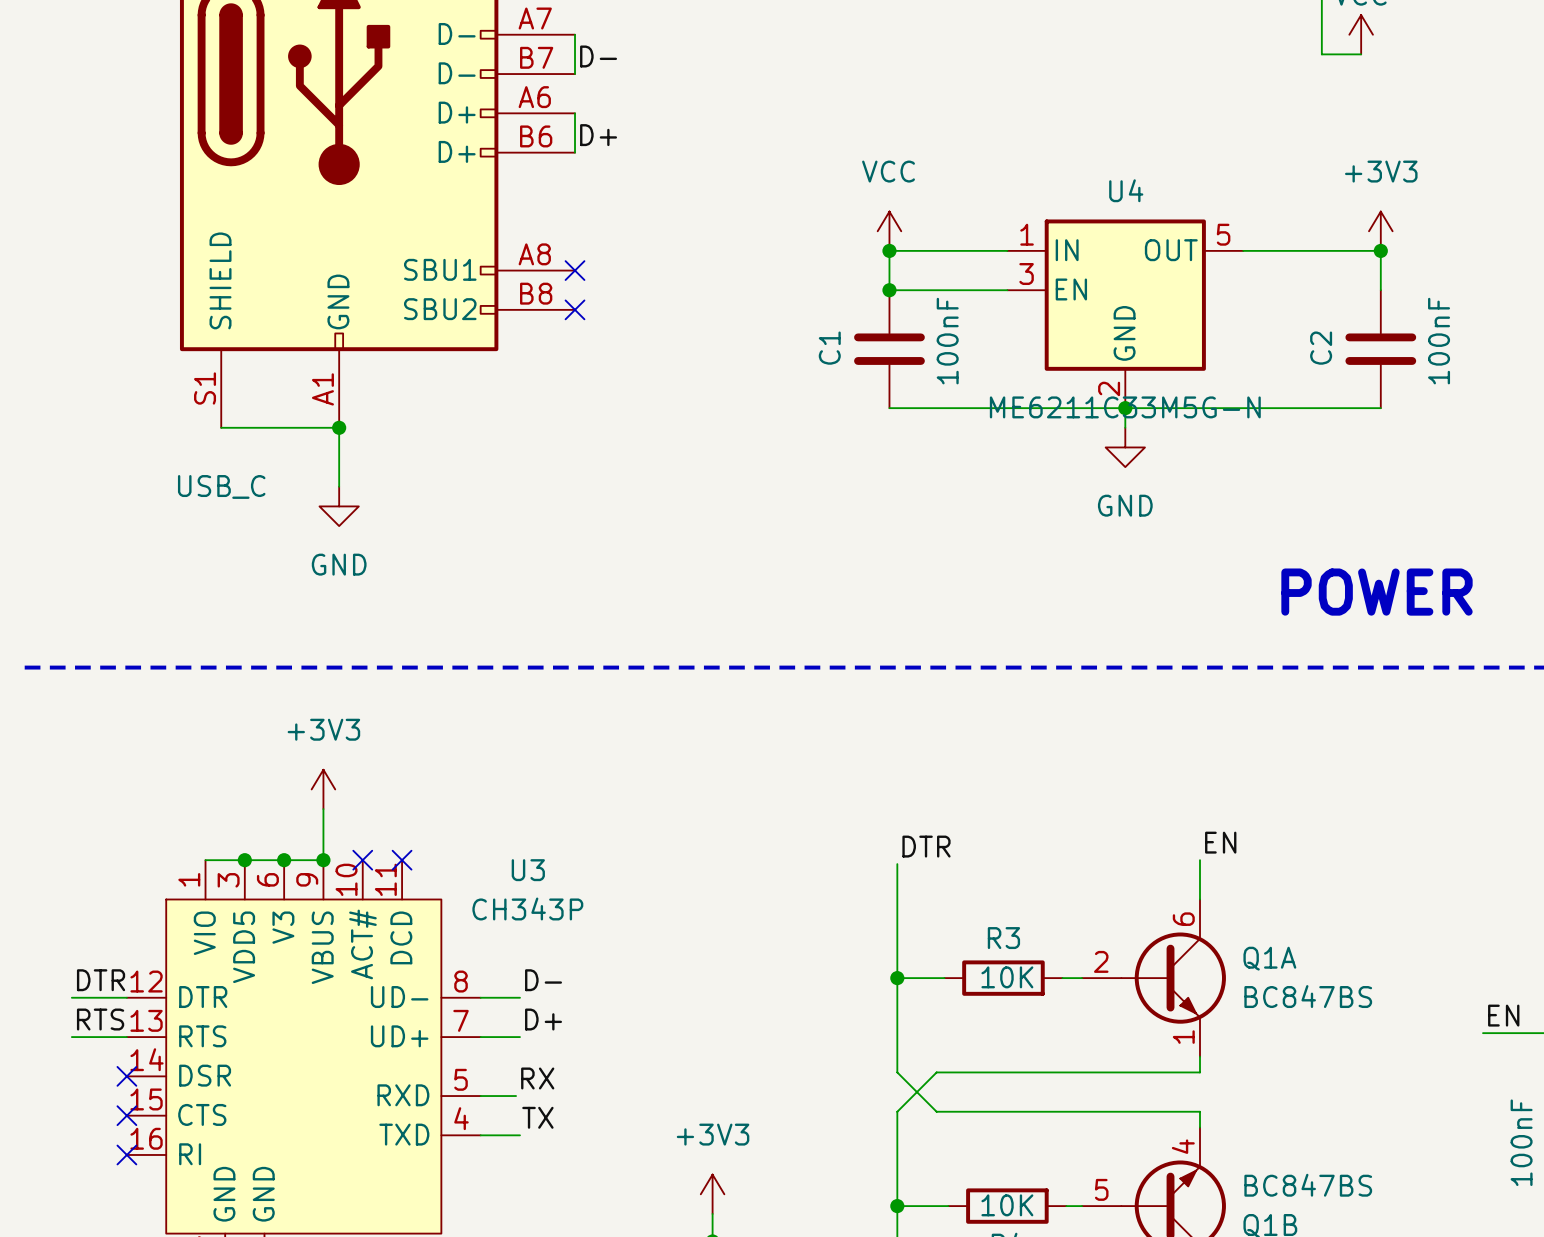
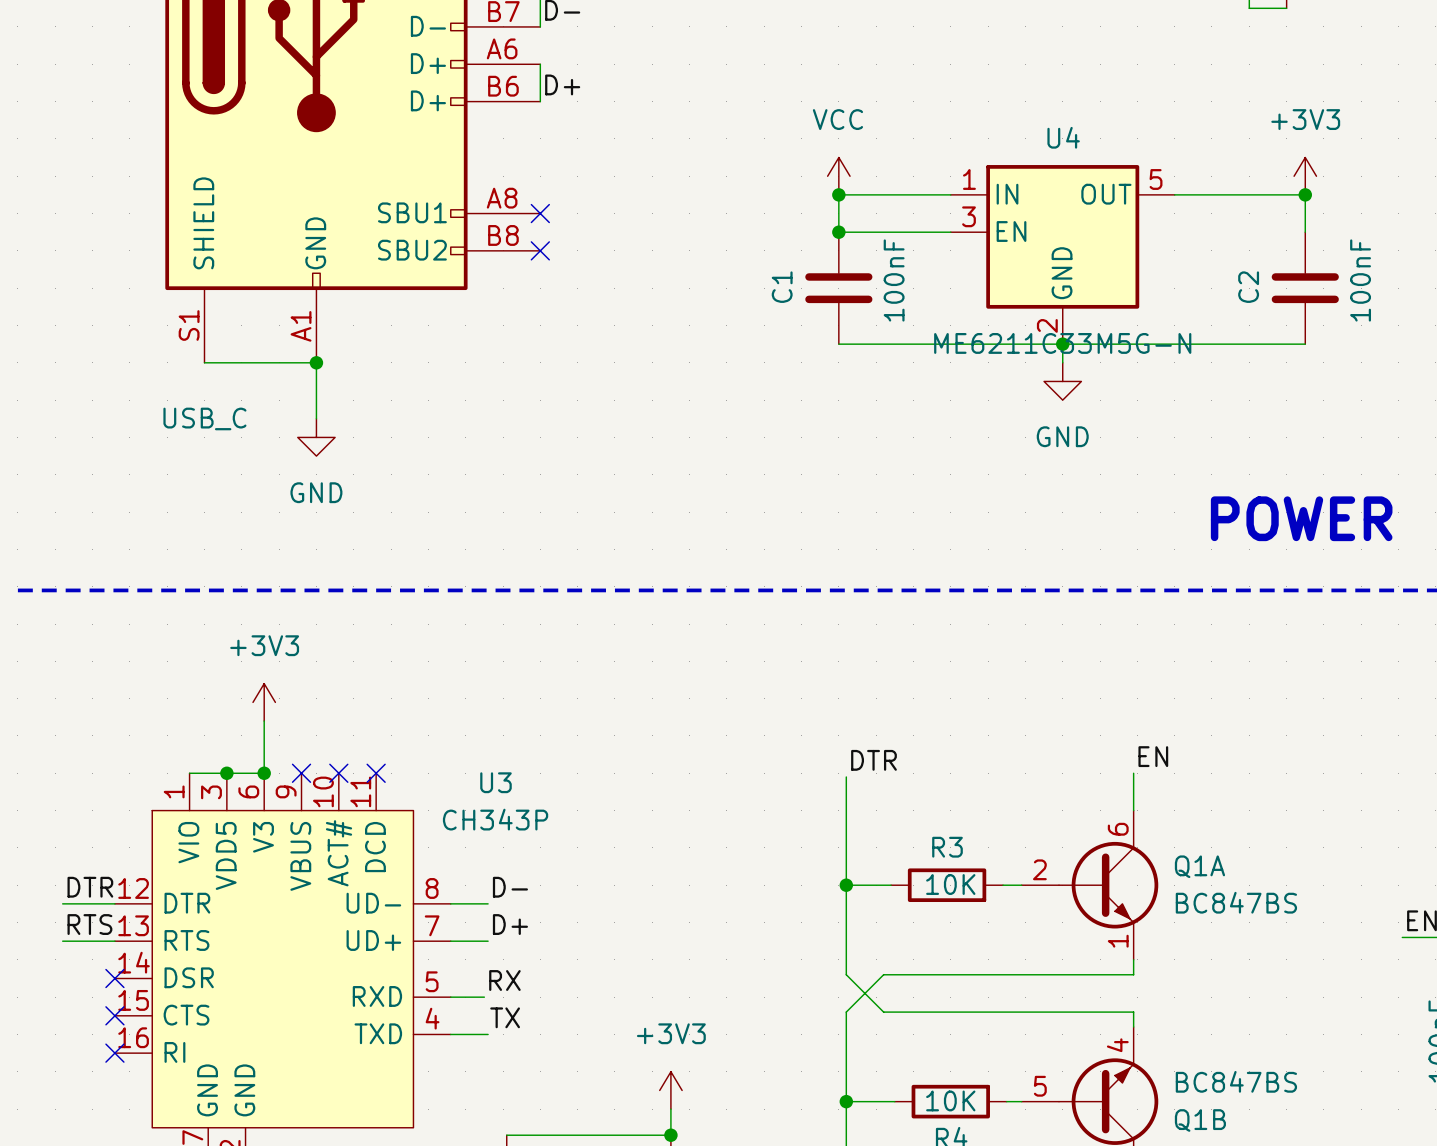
power symbol position: +3V3 (323, 789) -> +3V3 (264, 702)
wire: (323, 809) (323, 860) (284, 860) -> (264, 721) (264, 773)
junction: (323, 860) -> none
no-connect mark: none -> (301, 773)

